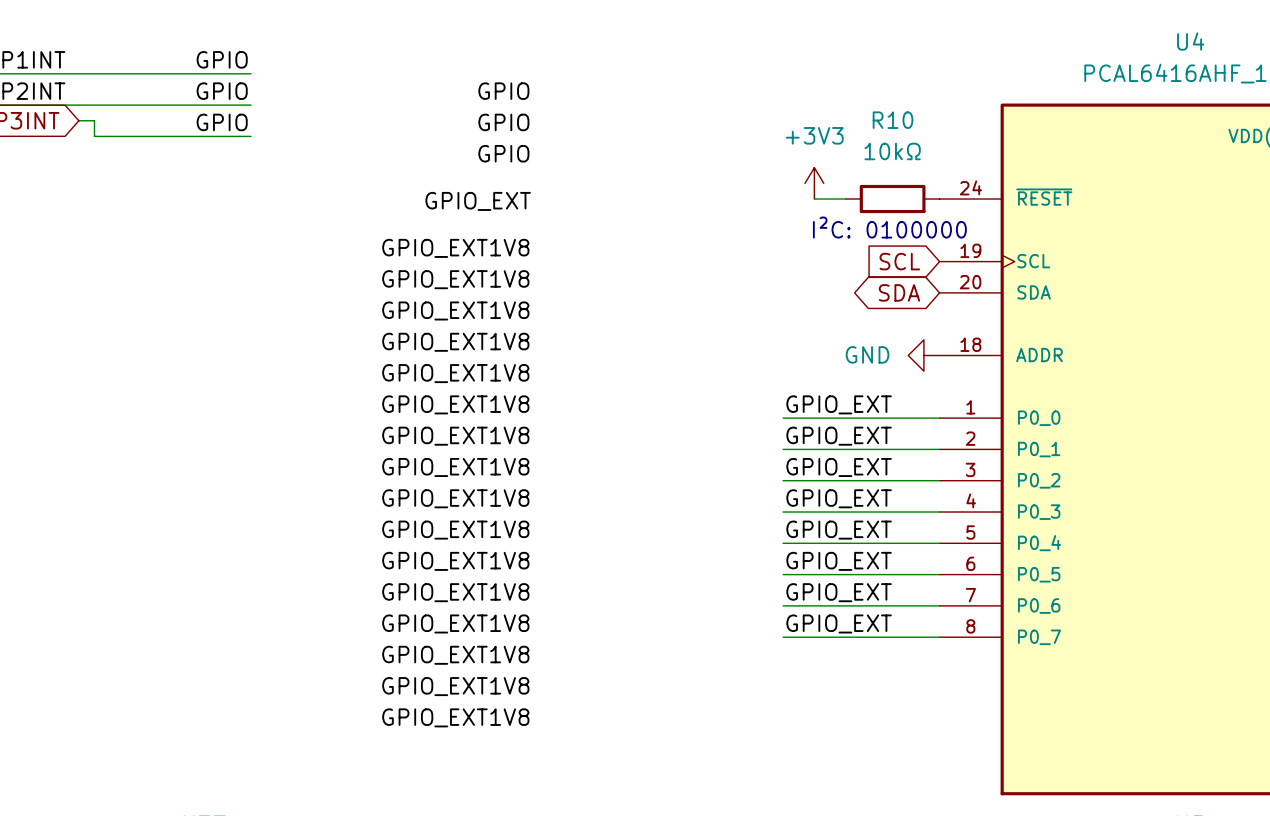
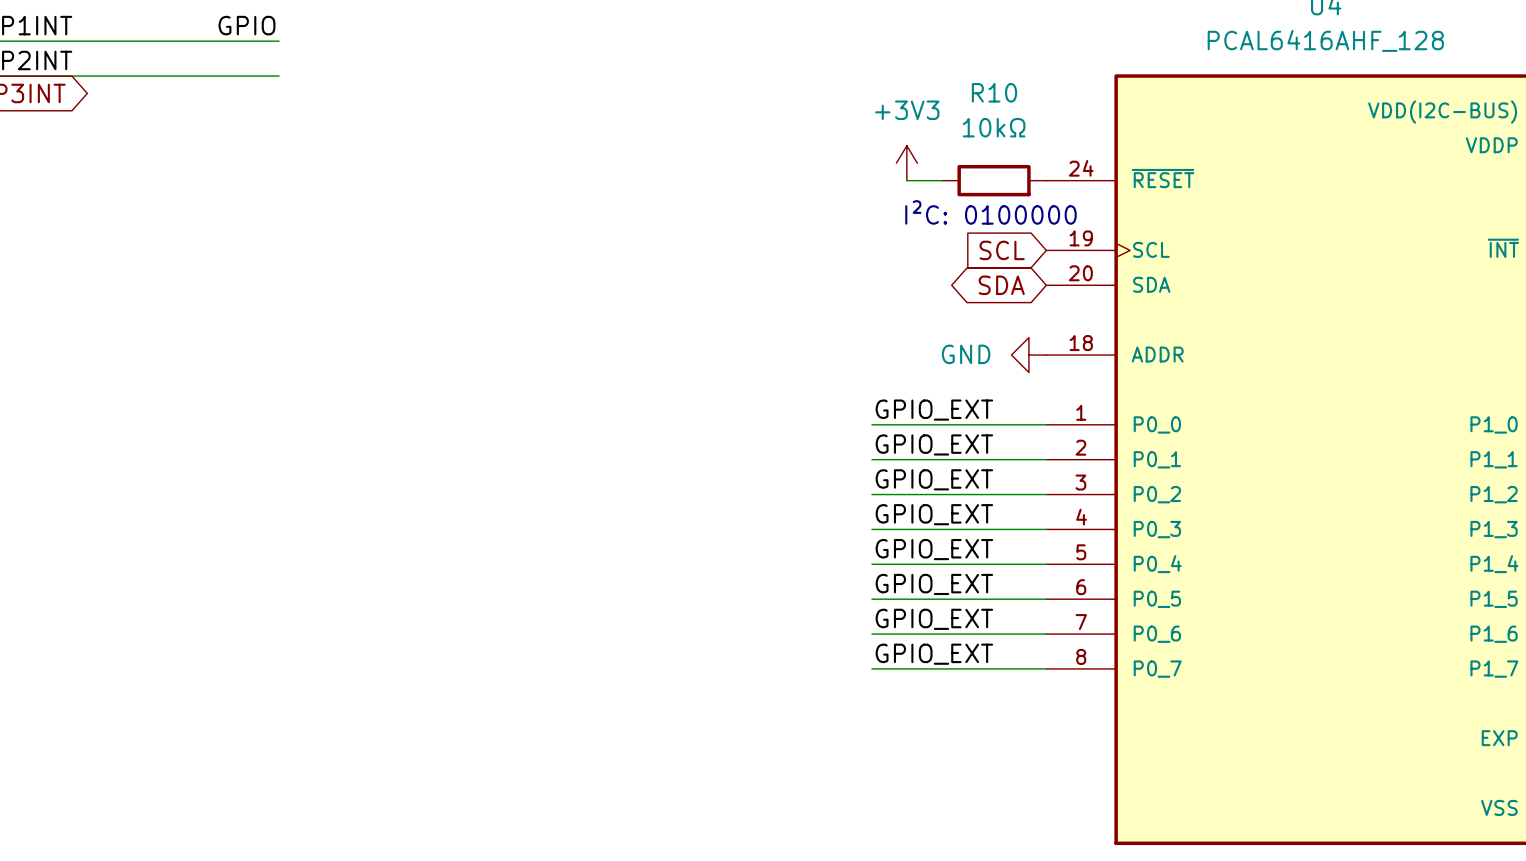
label: GPIO (222, 91) -> none
label: GPIO (503, 91) -> none
wire: (78, 120) (94, 120) (94, 136) (250, 136) -> none
label: GPIO (222, 122) -> none
label: GPIO (503, 122) -> none
label: GPIO (503, 153) -> none
label: GPIO_EXT (478, 201) -> none
label: GPIO_EXT1V8 (455, 248) -> none
label: GPIO_EXT1V8 (455, 279) -> none
label: GPIO_EXT1V8 (455, 310) -> none
label: GPIO_EXT1V8 (455, 342) -> none
label: GPIO_EXT1V8 (455, 373) -> none
label: GPIO_EXT1V8 (455, 404) -> none
label: GPIO_EXT1V8 (455, 436) -> none
label: GPIO_EXT1V8 (455, 467) -> none
label: GPIO_EXT1V8 (455, 498) -> none
label: GPIO_EXT1V8 (455, 530) -> none
label: GPIO_EXT1V8 (455, 561) -> none
label: GPIO_EXT1V8 (455, 592) -> none
label: GPIO_EXT1V8 (455, 623) -> none
label: GPIO_EXT1V8 (455, 655) -> none
label: GPIO_EXT1V8 (455, 686) -> none
label: GPIO_EXT1V8 (455, 717) -> none

